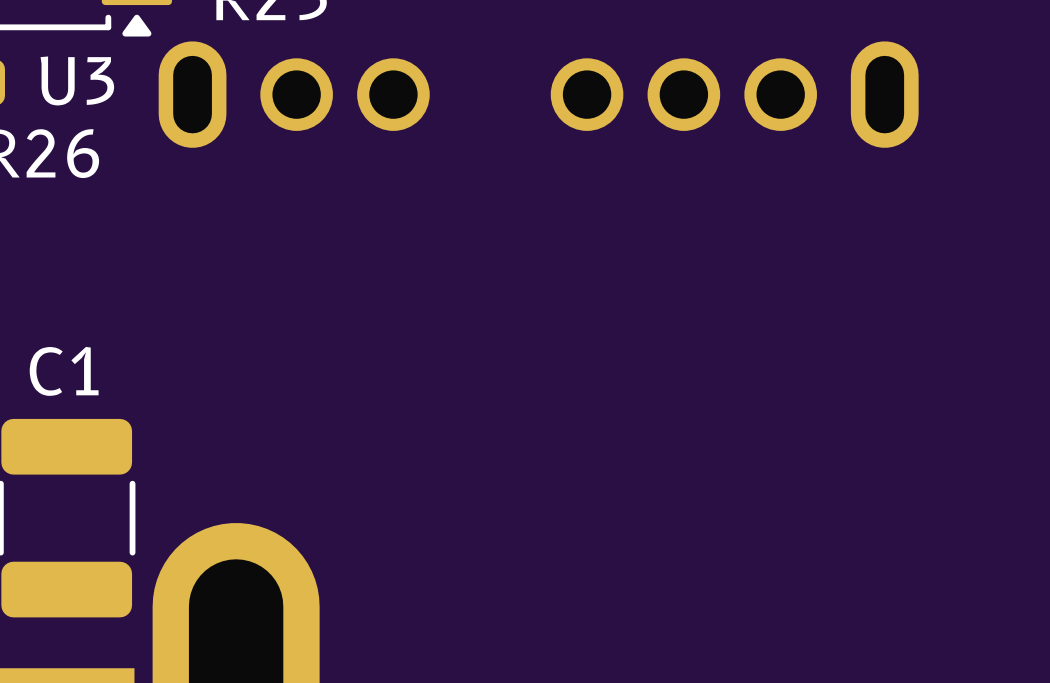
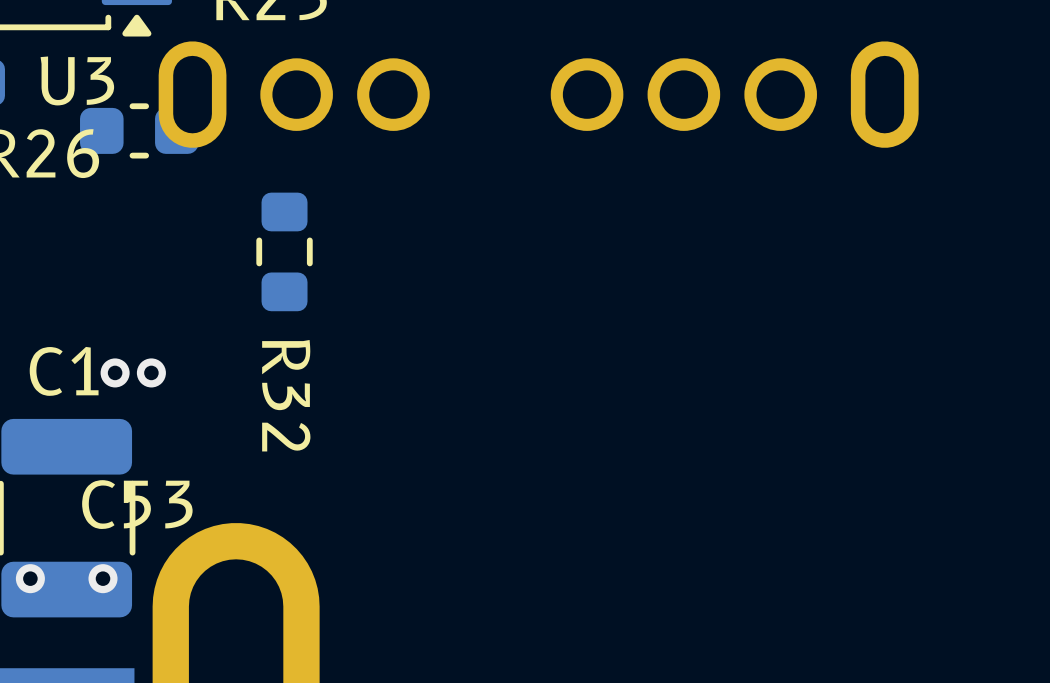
C53: none -> (139, 130)
R32: none -> (284, 251)
via: none -> (115, 372)
via: none -> (151, 372)
via: none -> (30, 578)
via: none -> (103, 578)

